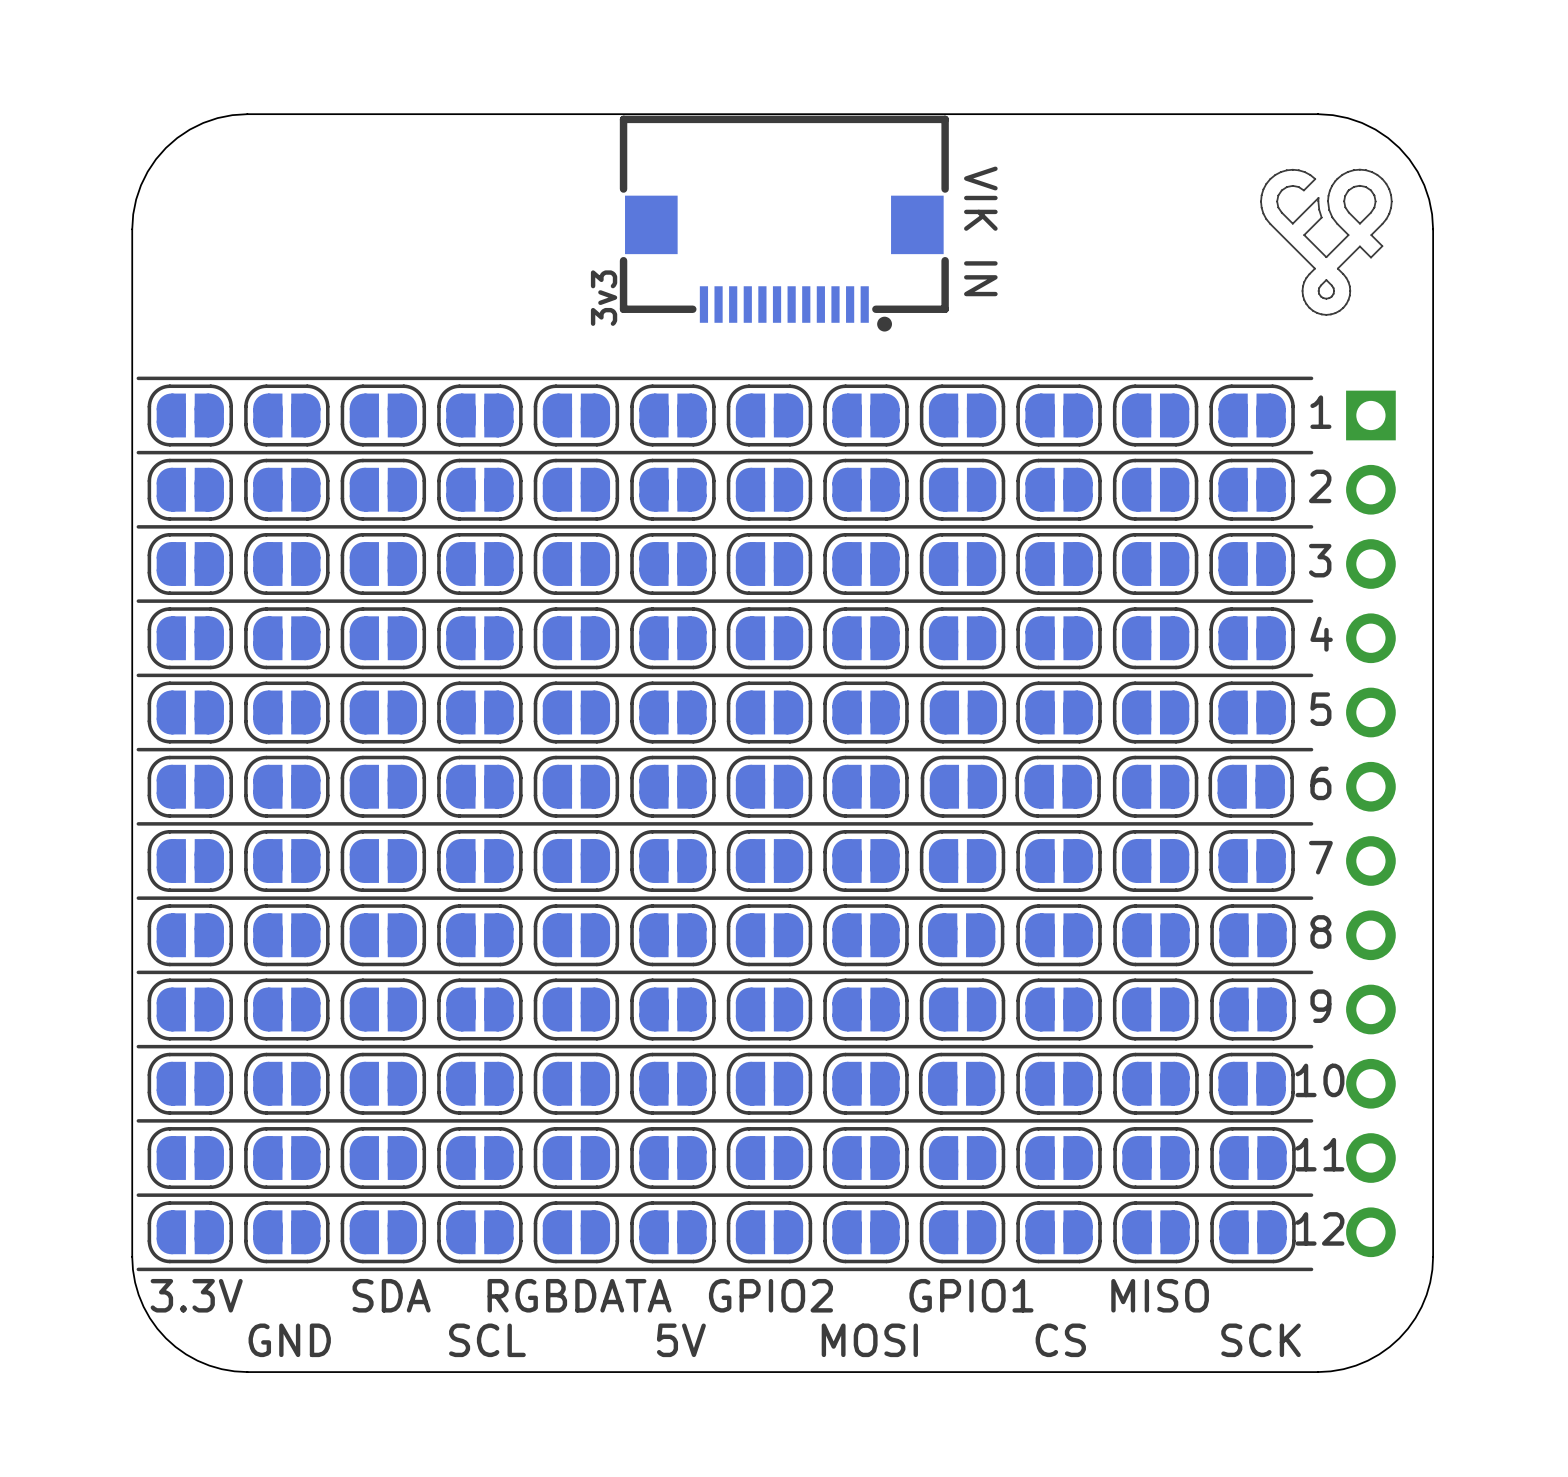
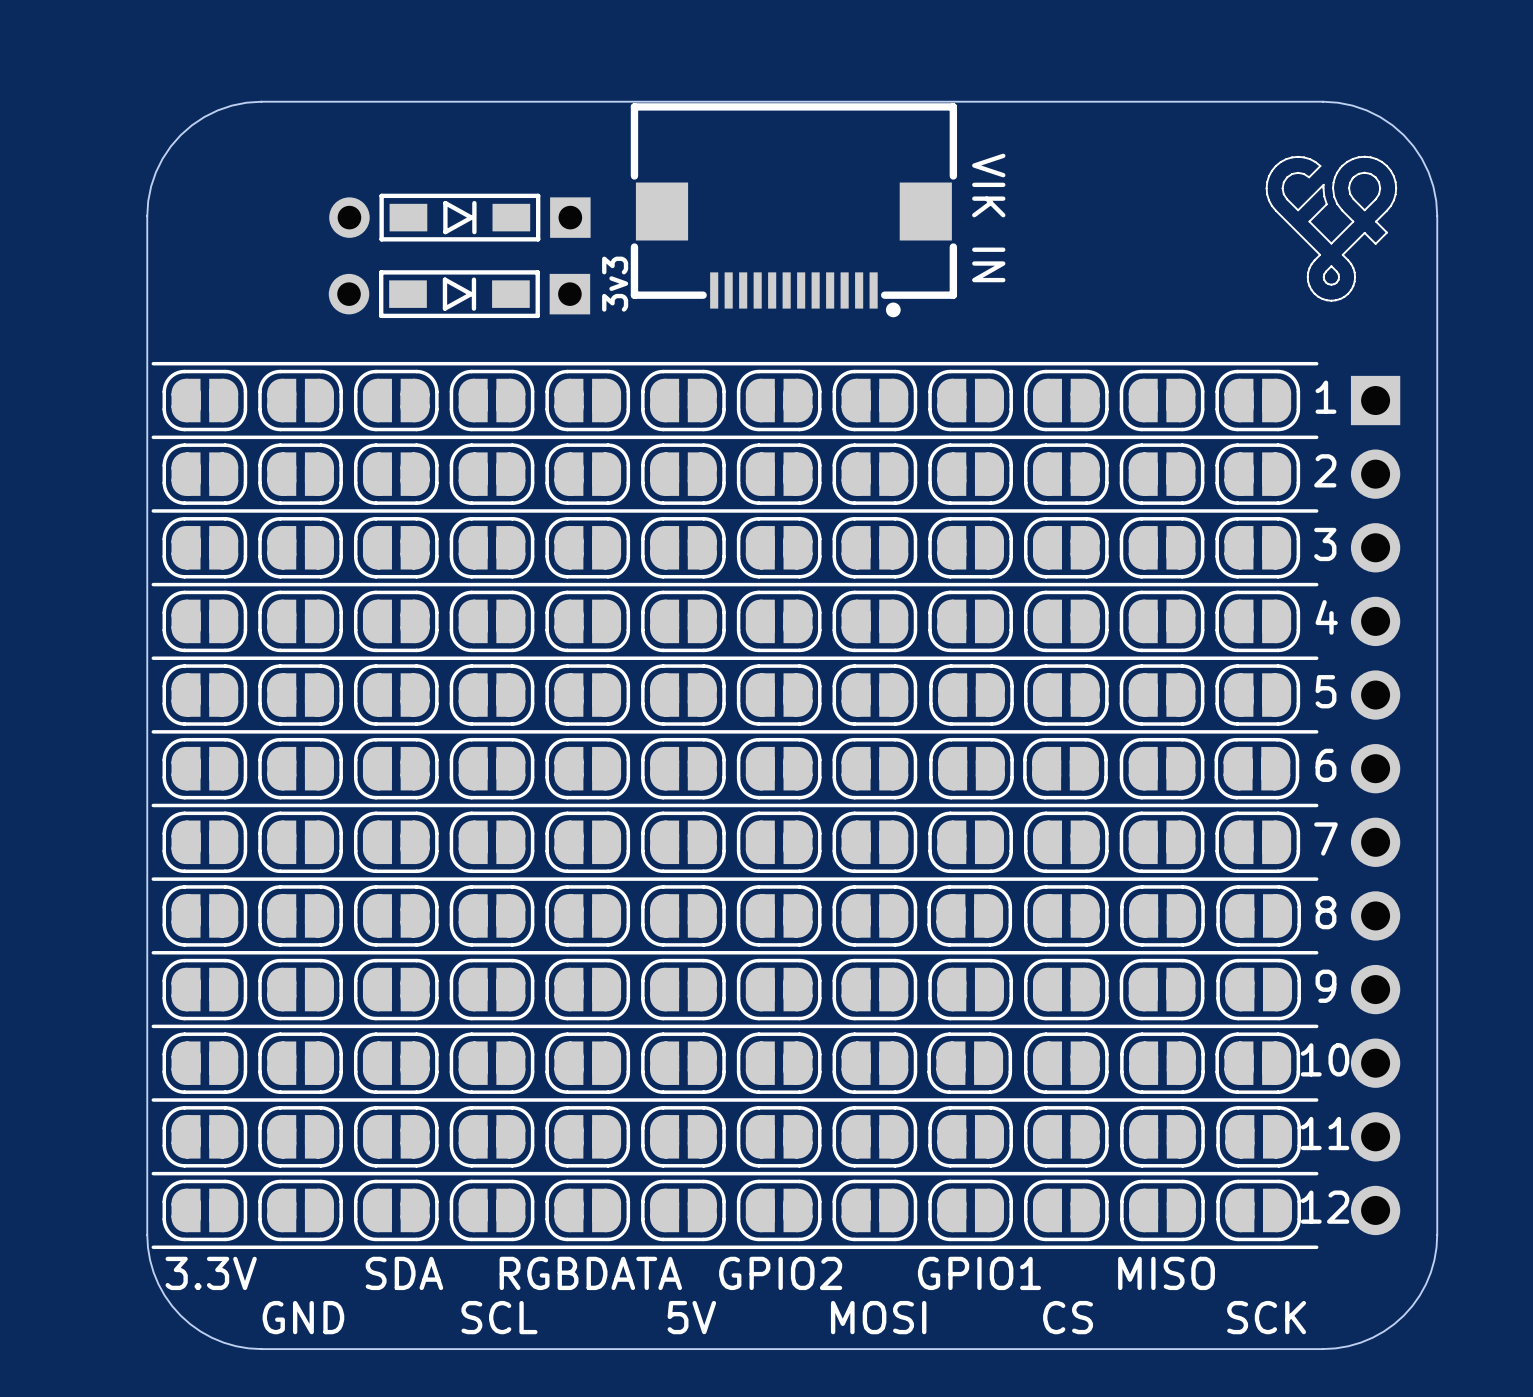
part: none -> (459, 217)
part: none -> (459, 294)

